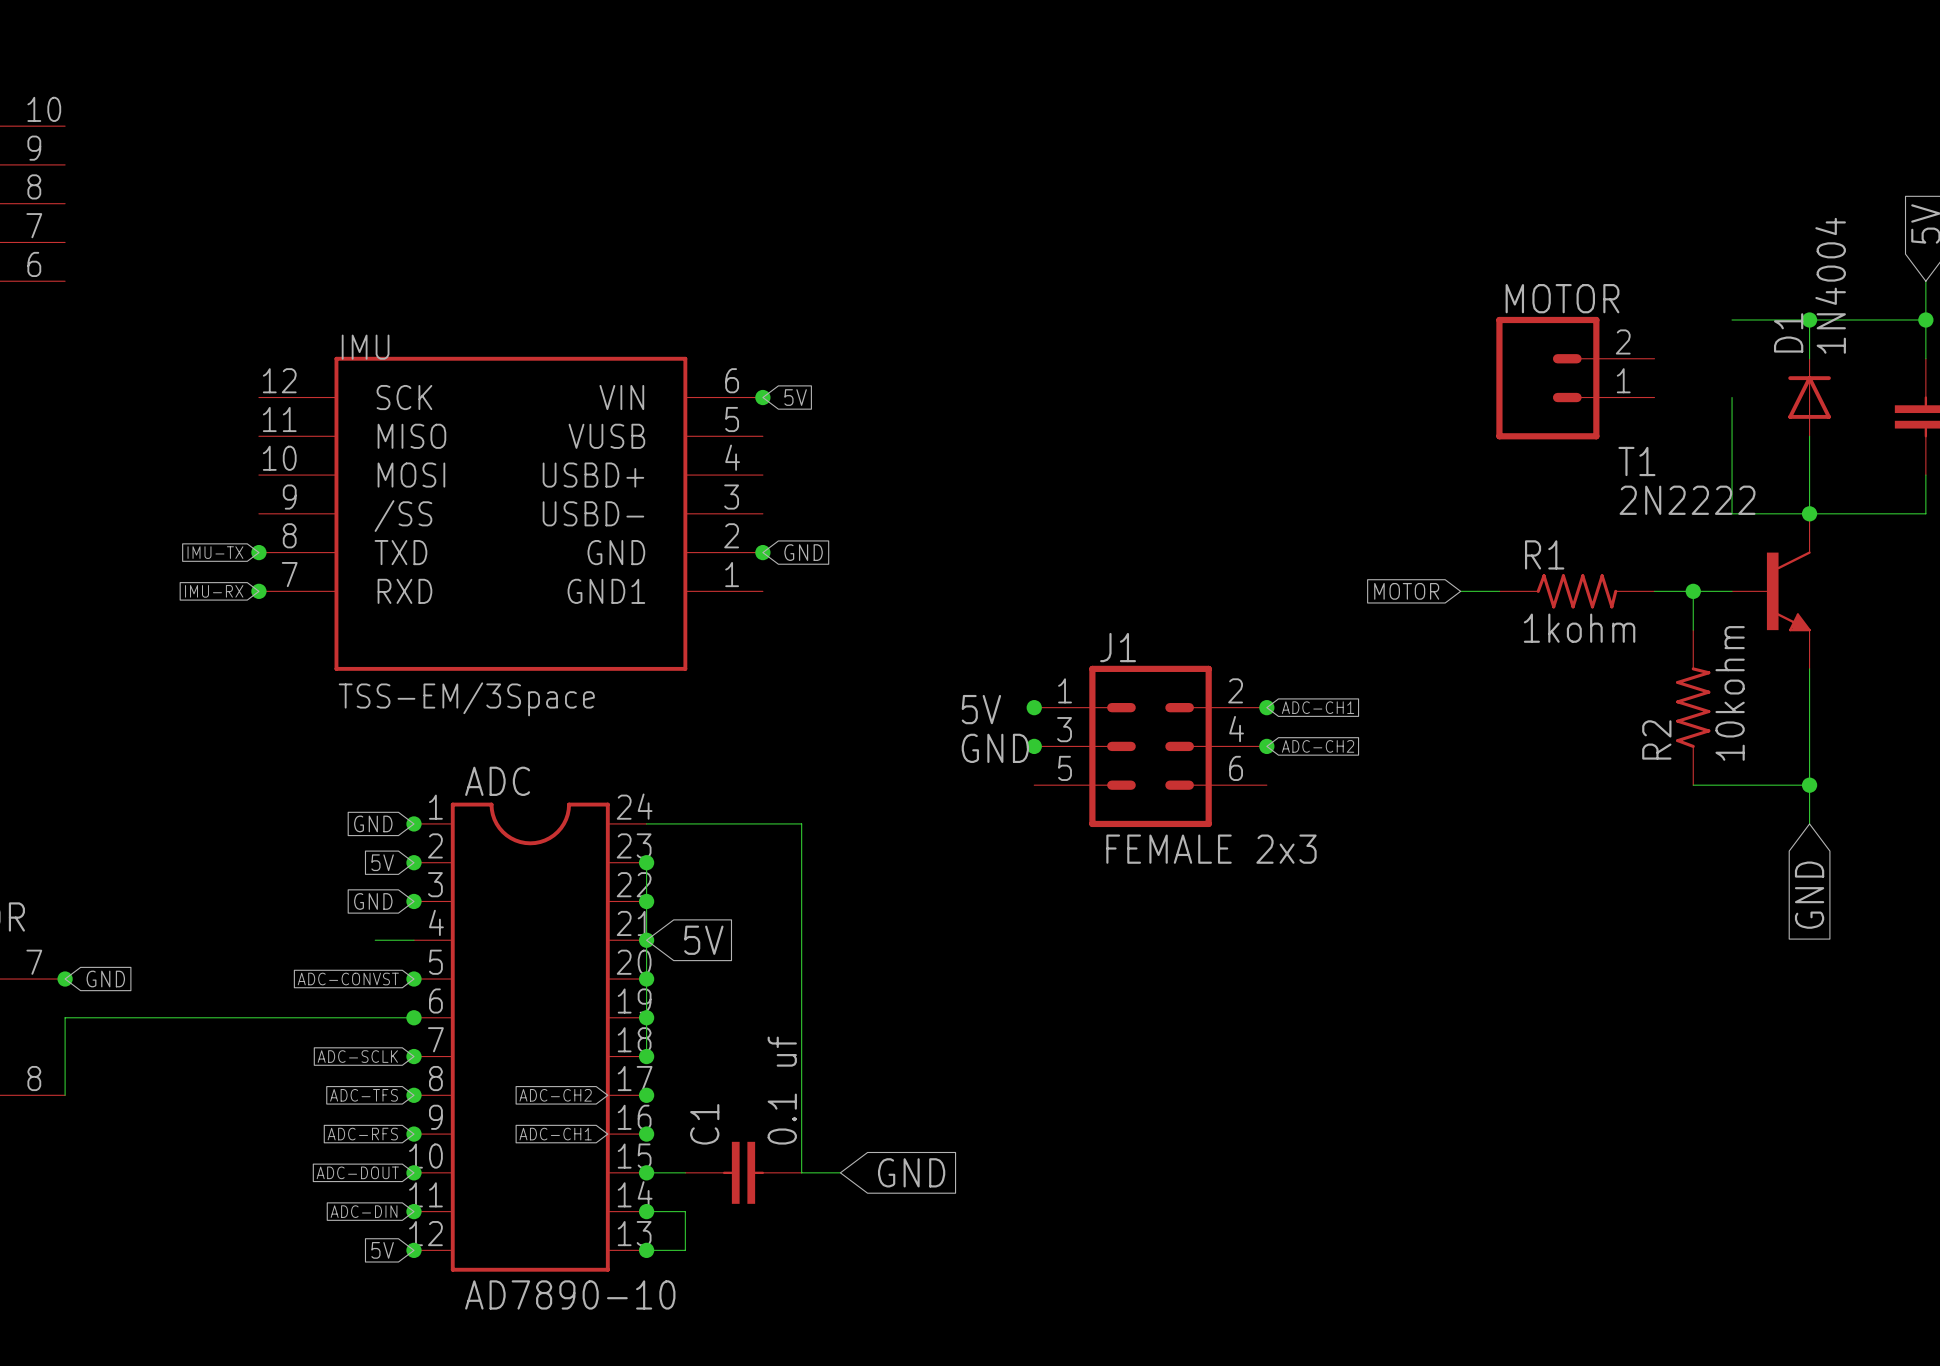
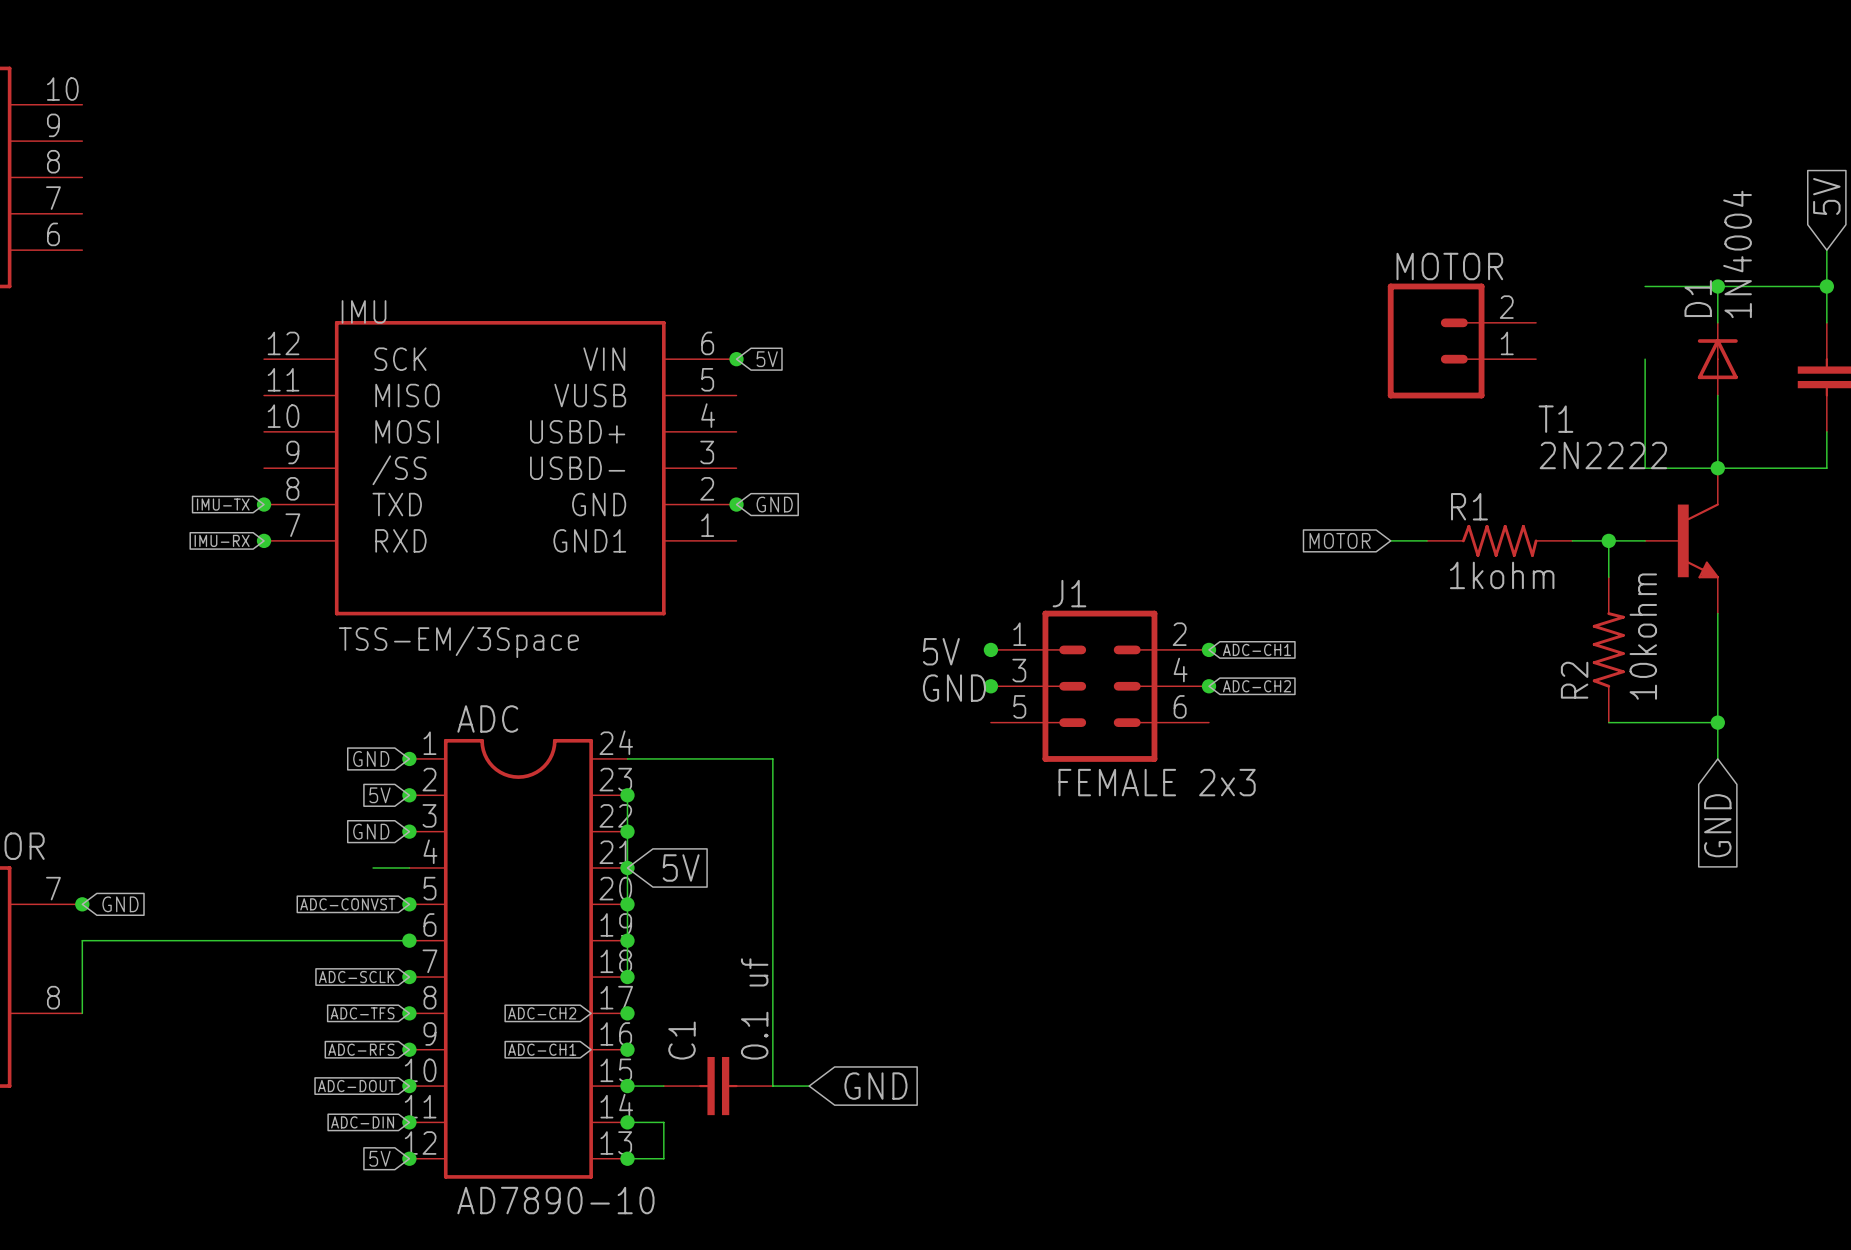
MOTOR position: (1575, 378) -> (1461, 341)

